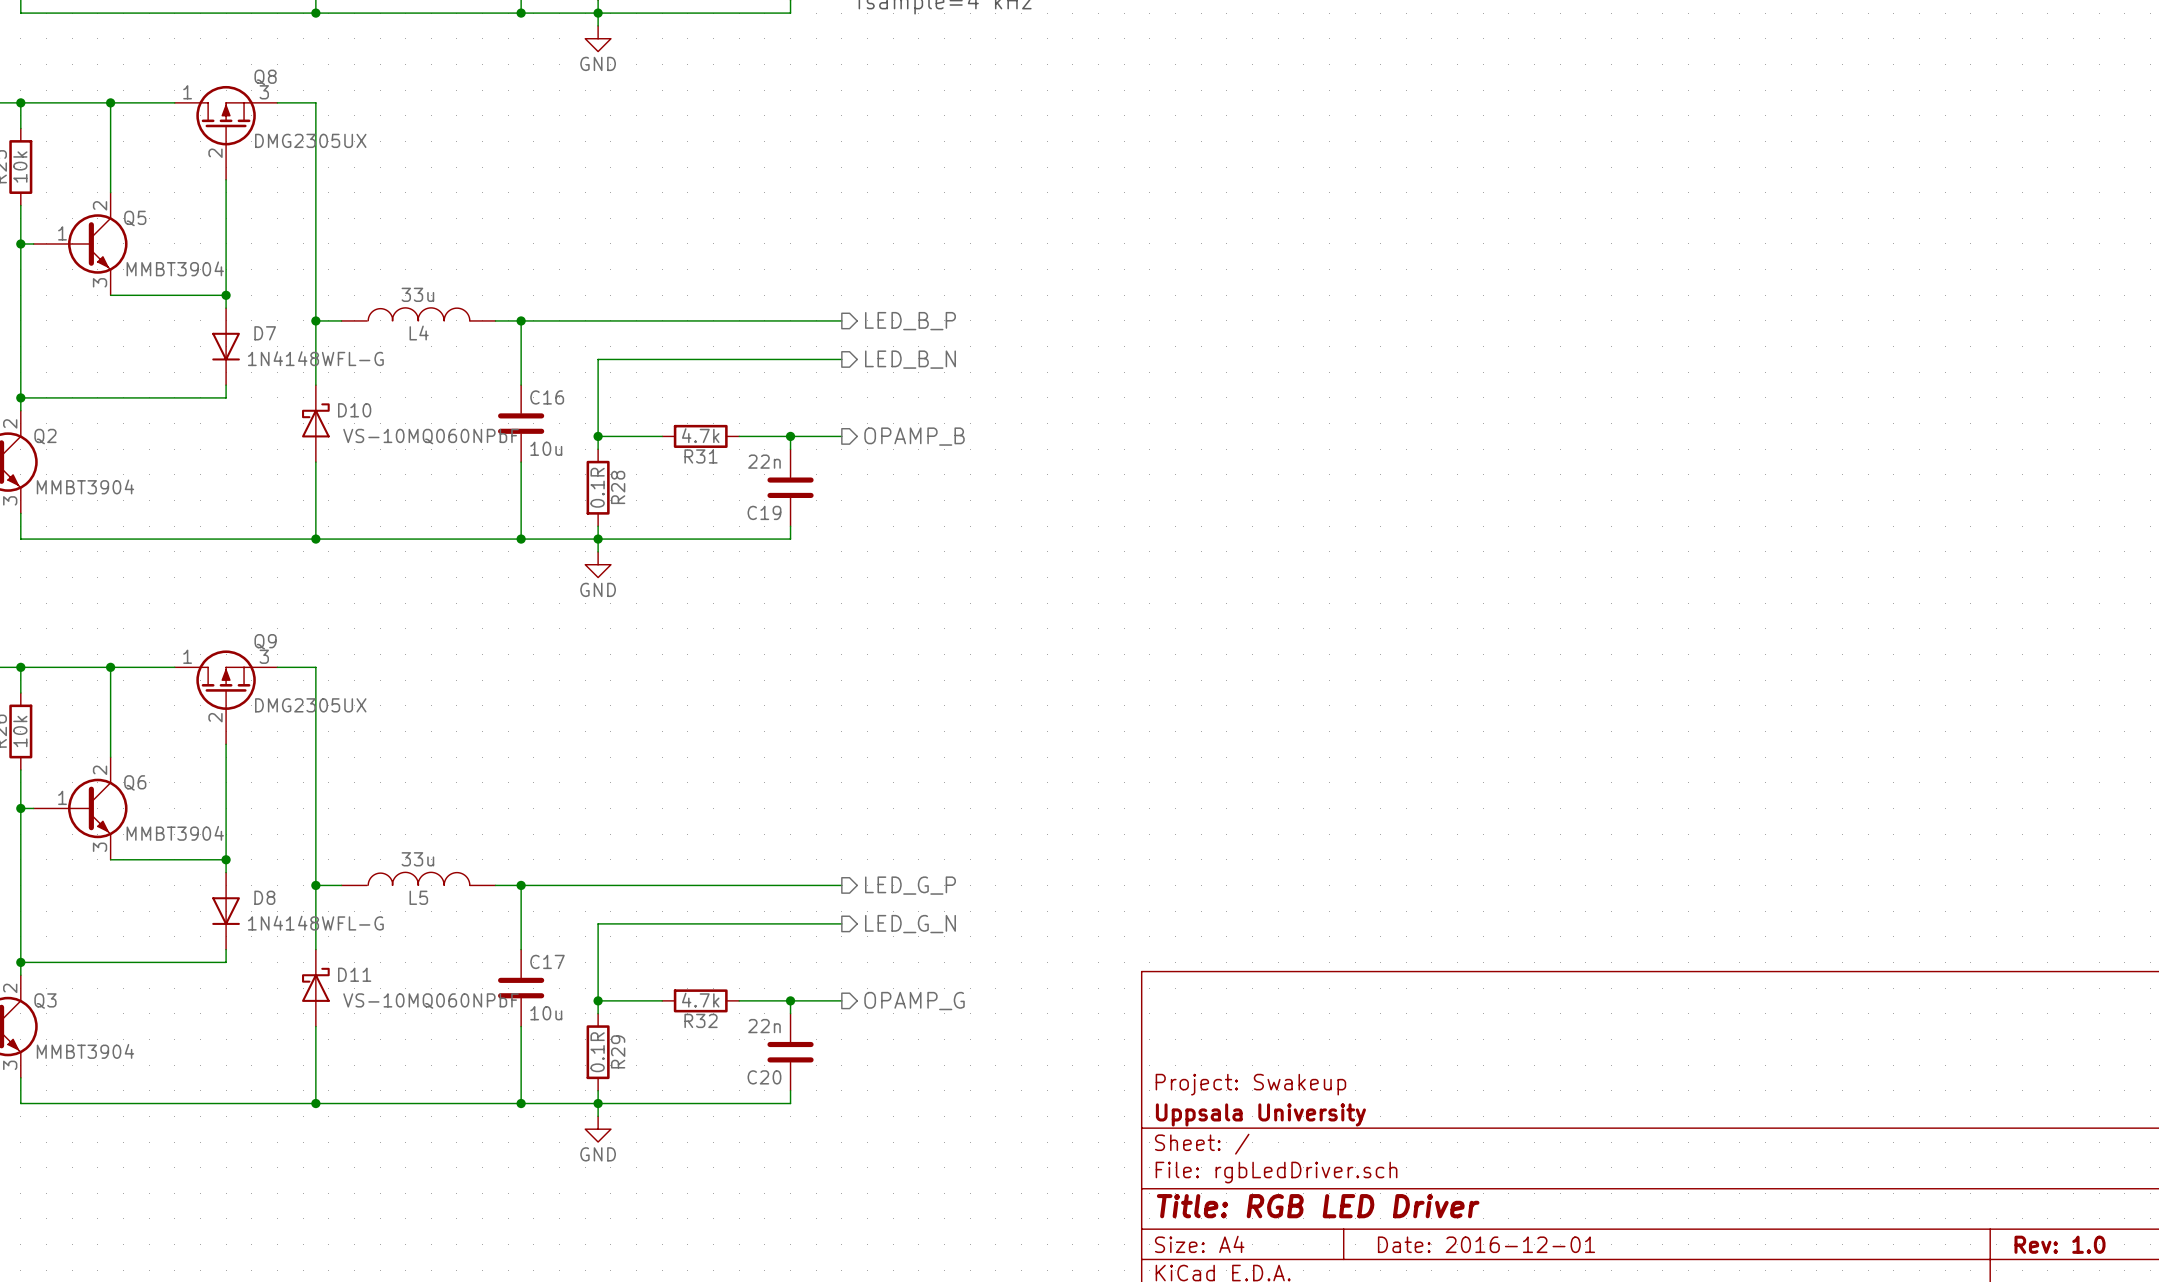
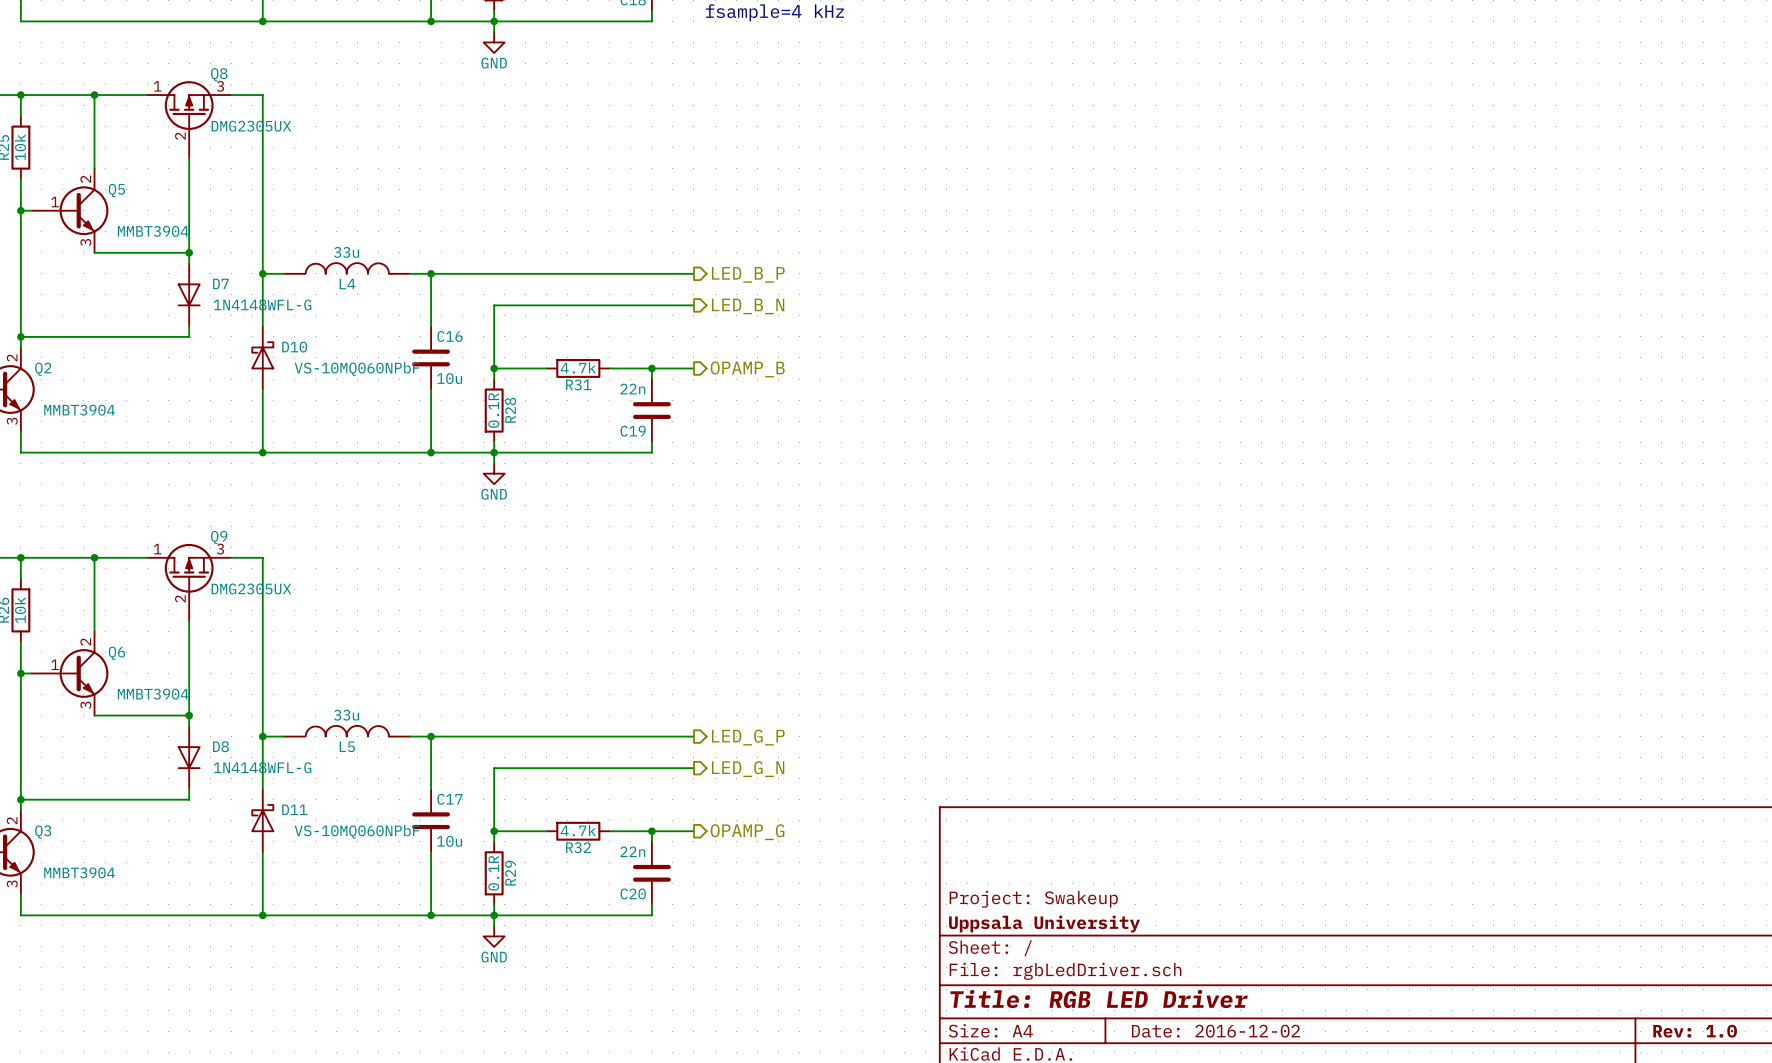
title block: Date: 2016-12-01 (1486, 1244) -> Date: 2016-12-02 (1215, 1031)

